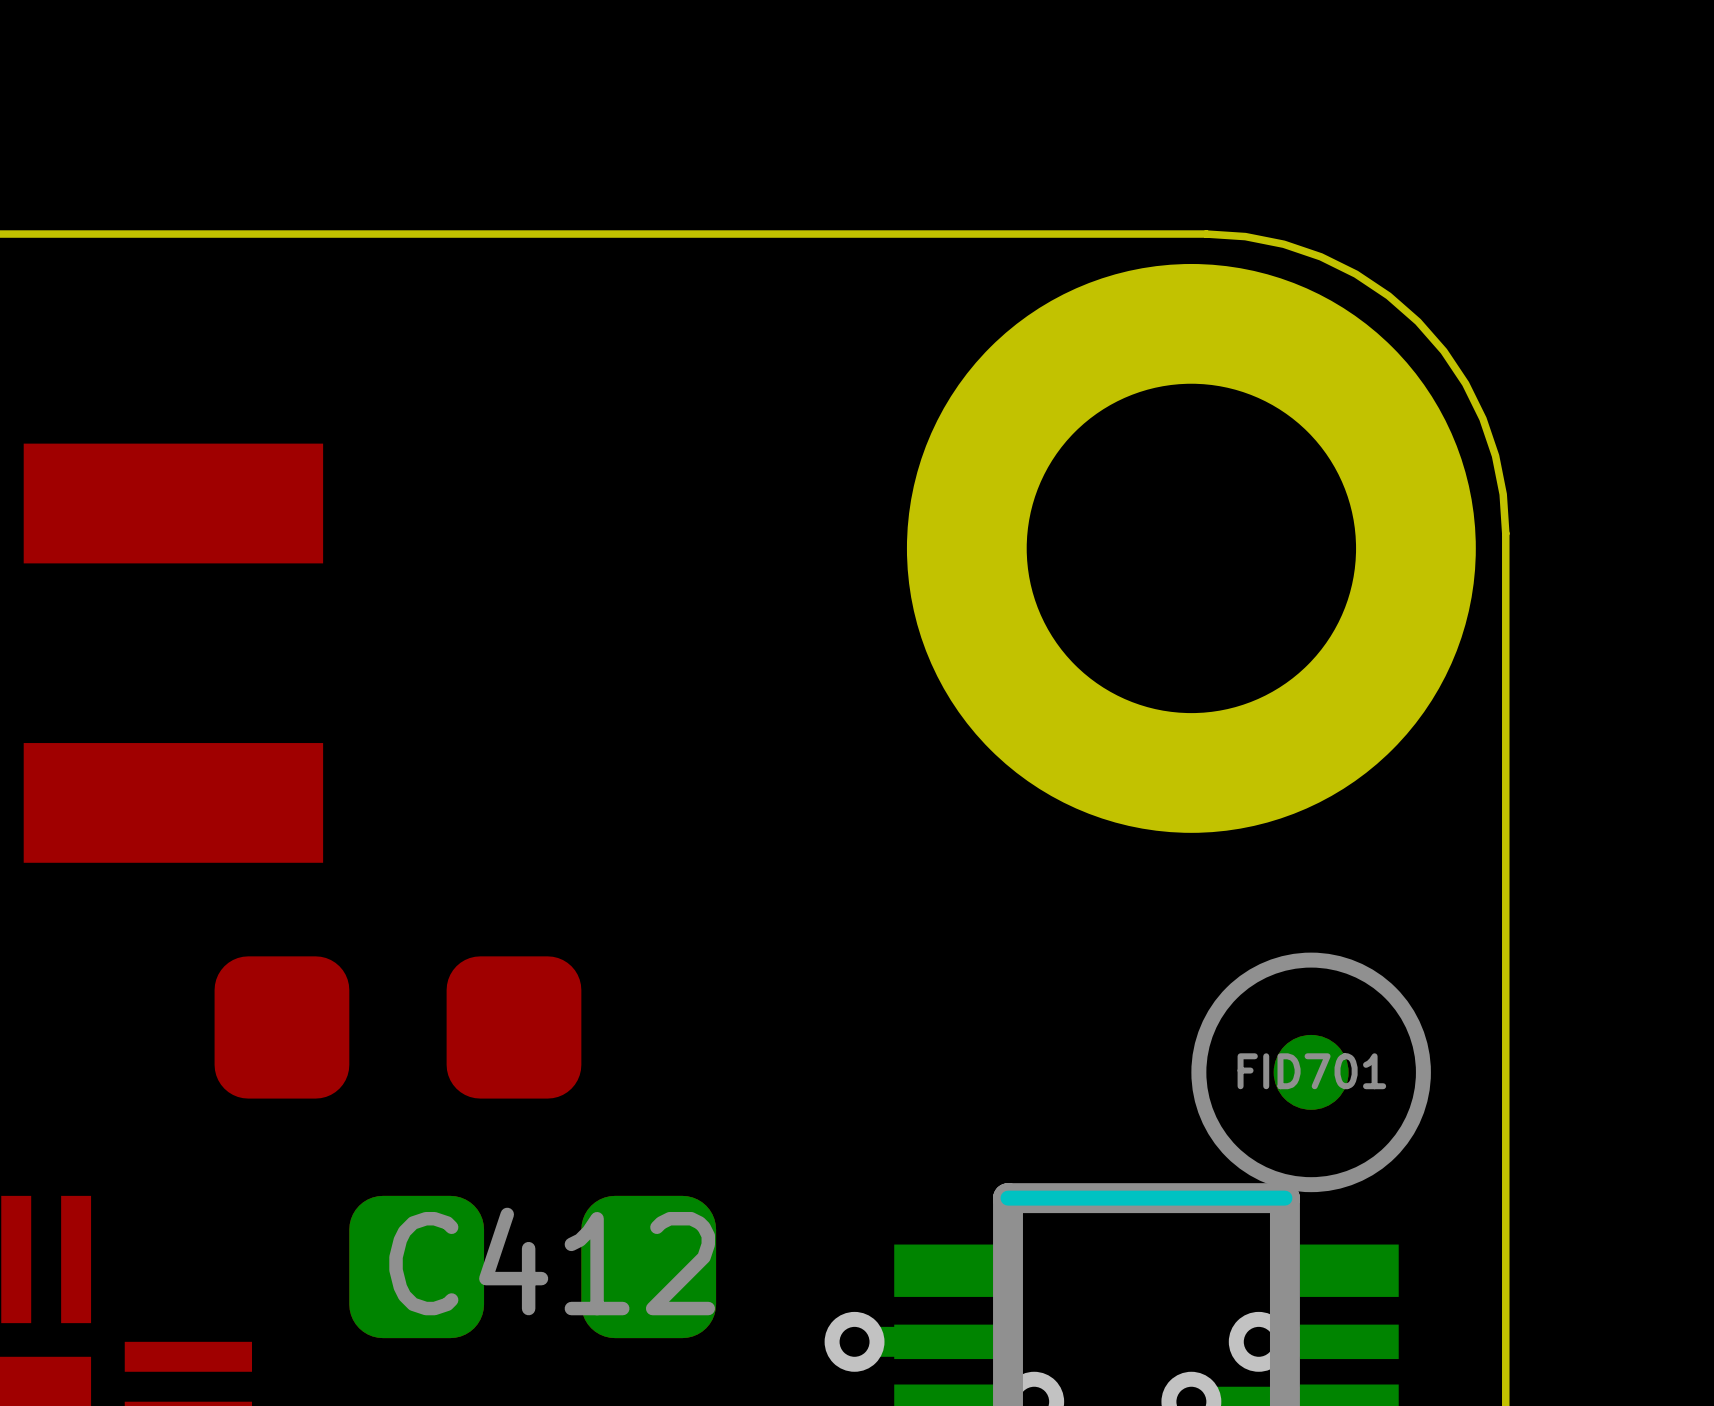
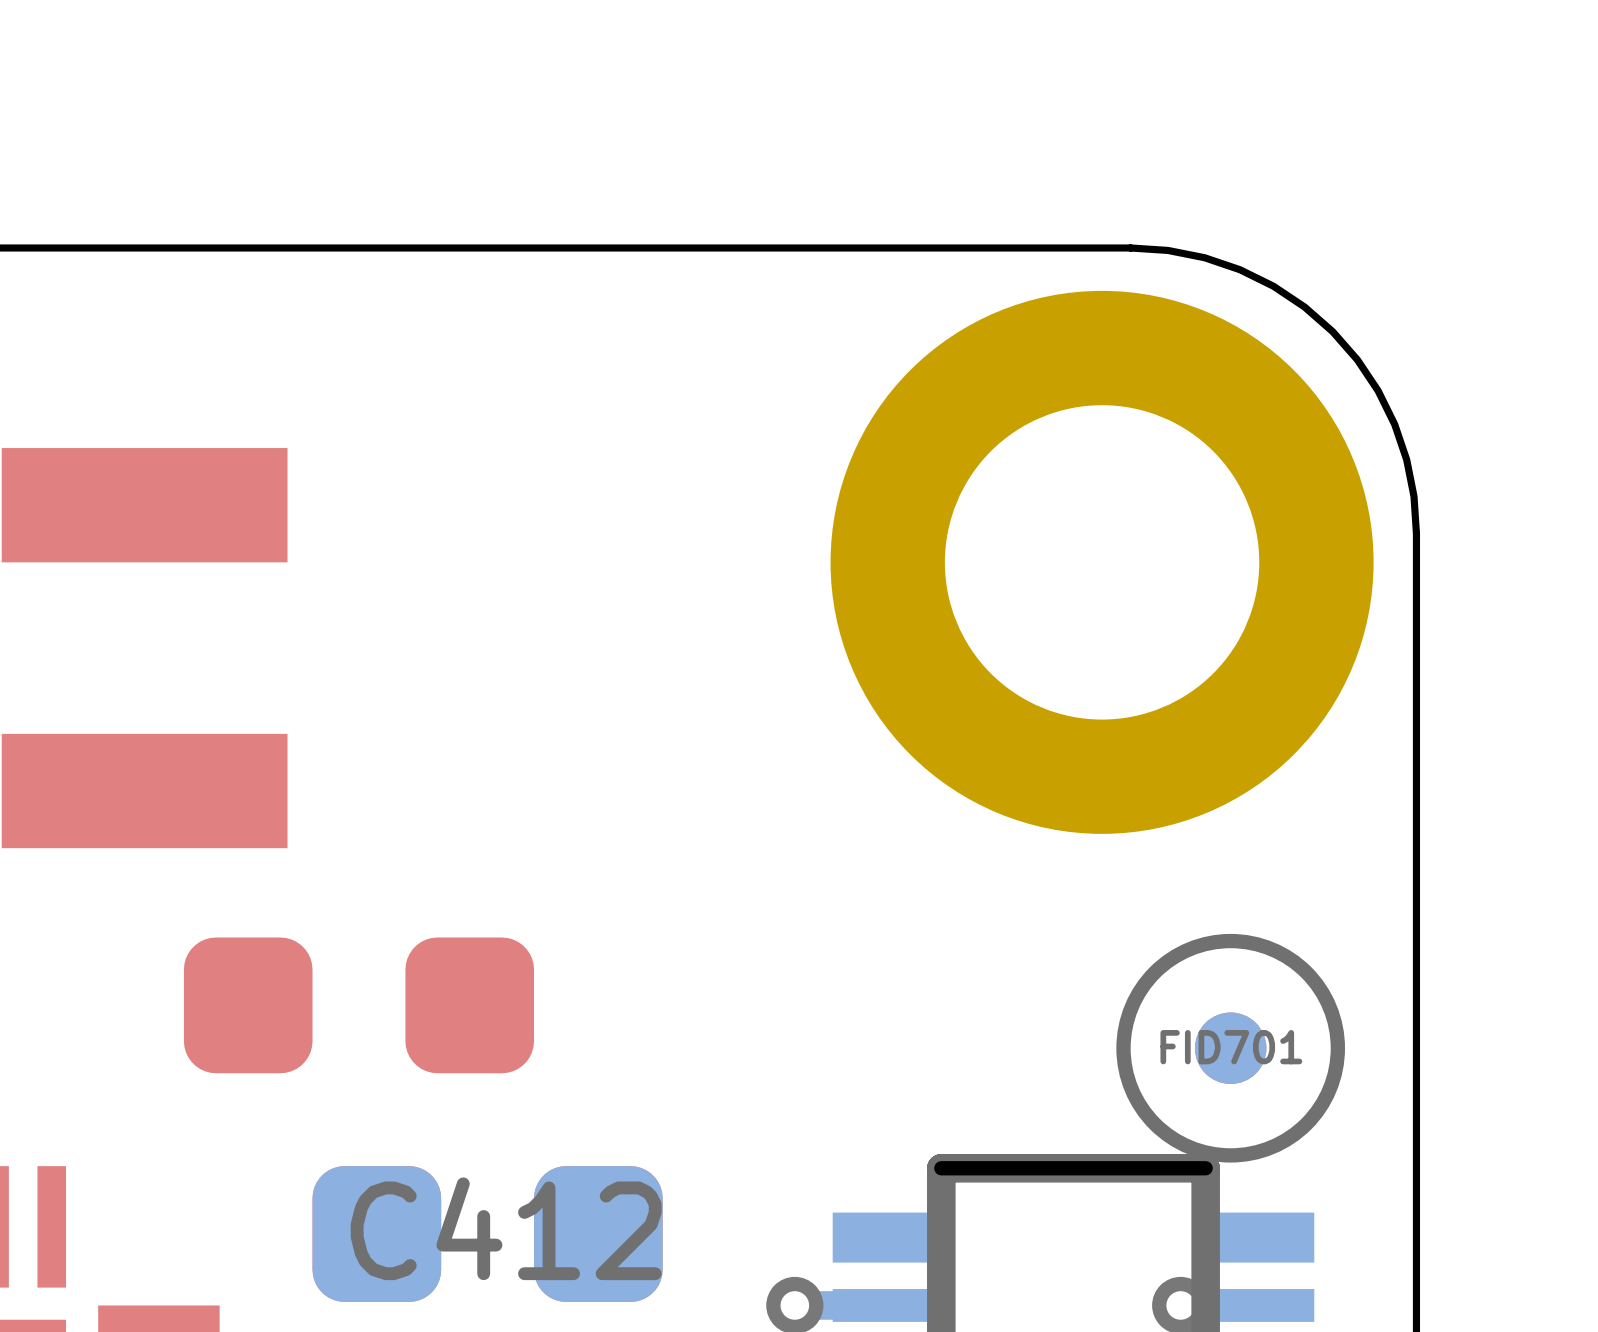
part position: (1191, 548) -> (1102, 562)

